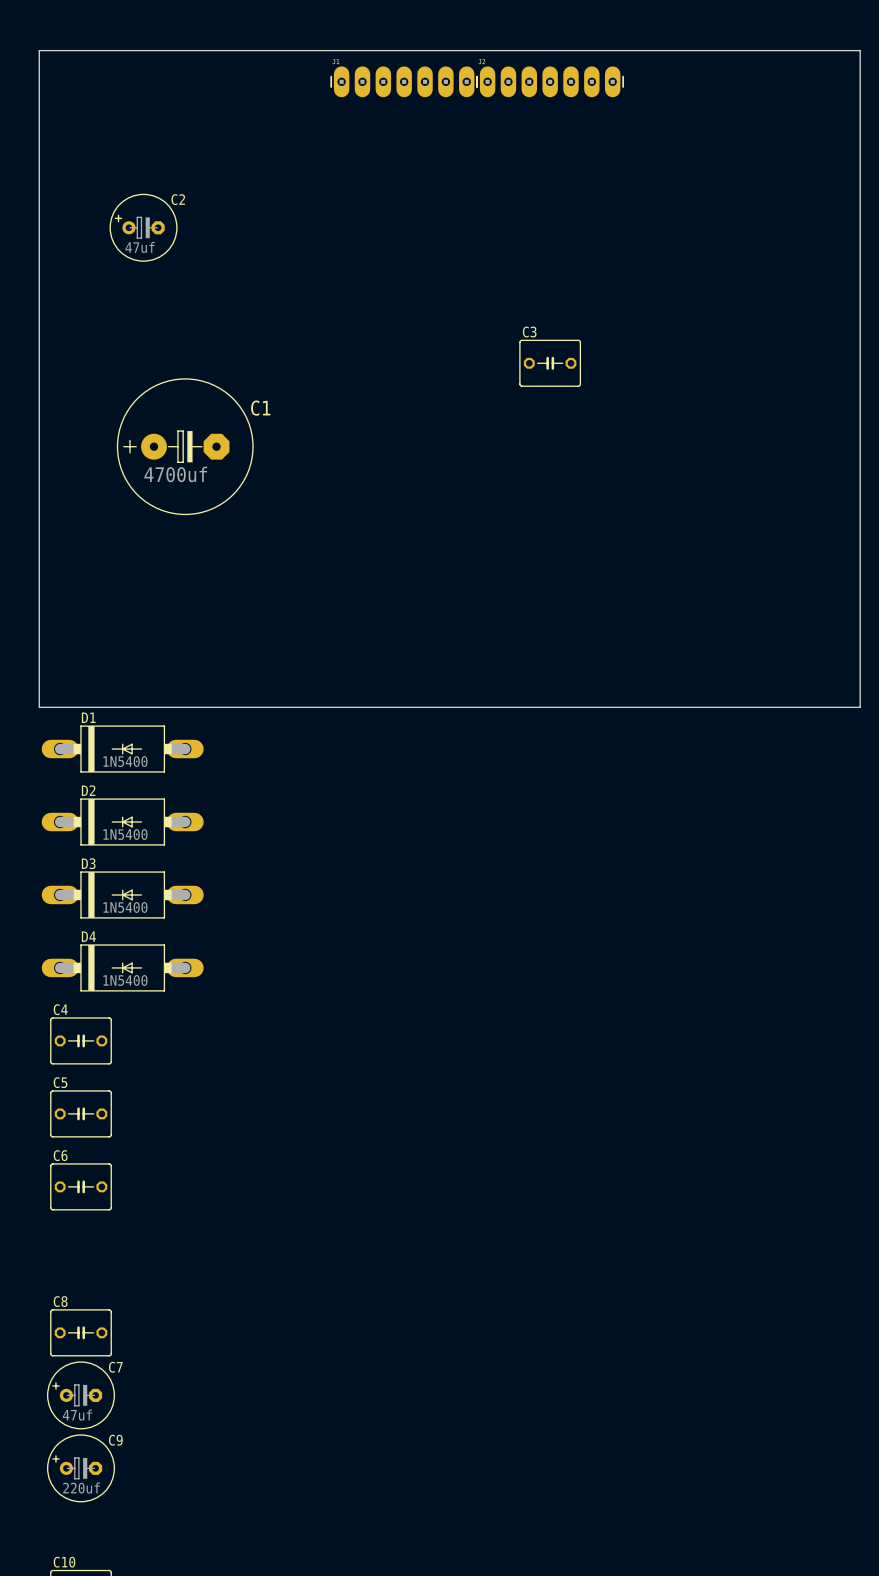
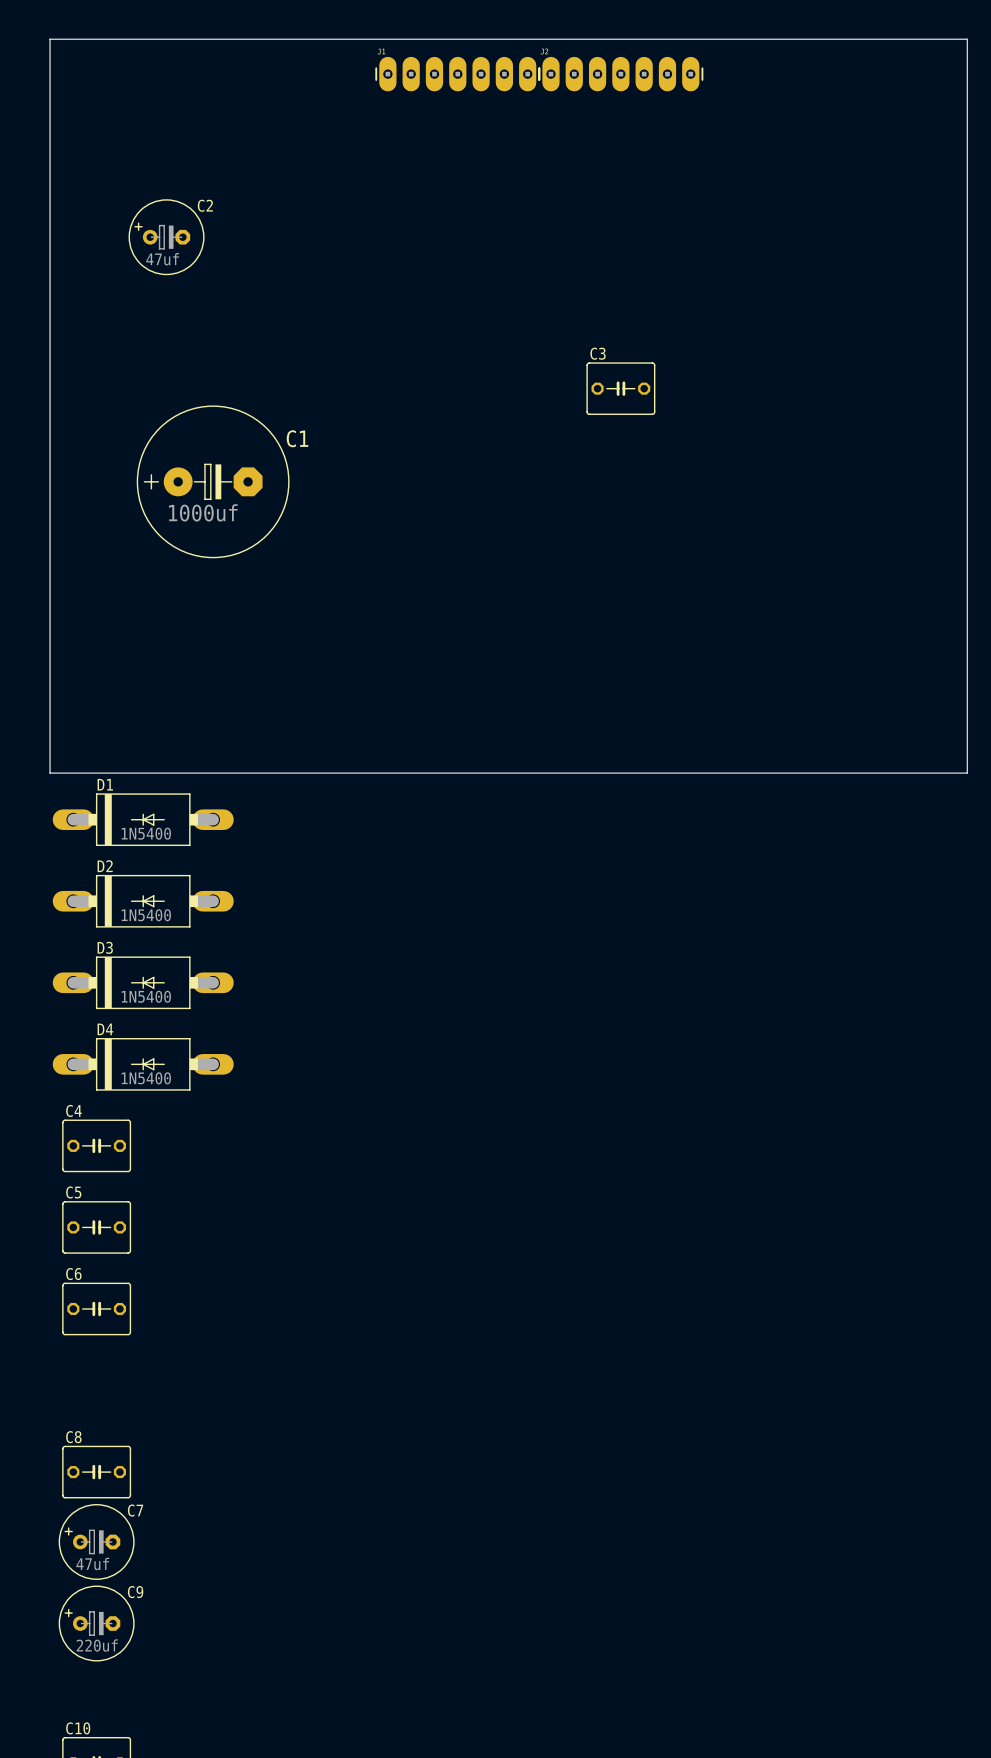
C1 value: 4700uf (175, 474) -> 1000uf (203, 512)

